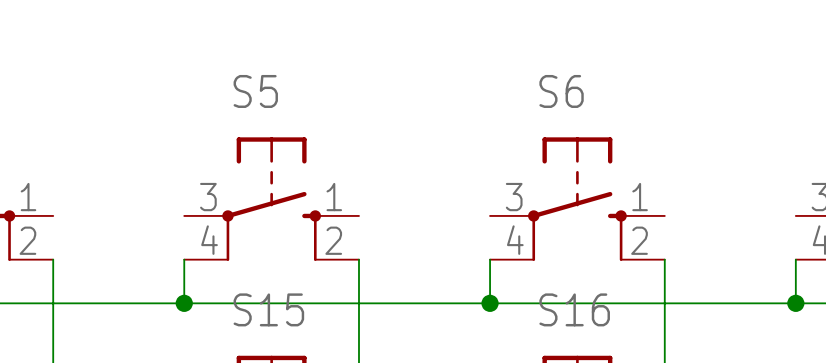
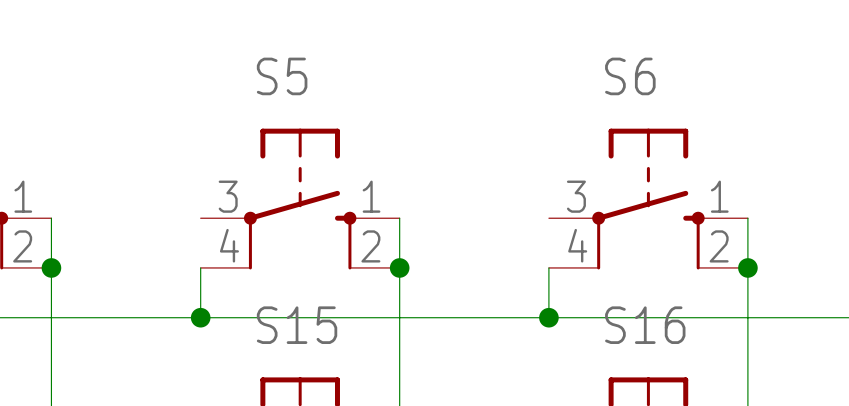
wire: none -> (51, 218) (51, 267)
wire: none -> (399, 218) (399, 267)
wire: none -> (747, 218) (747, 267)
junction: none -> (51, 267)
junction: none -> (399, 267)
junction: none -> (747, 267)

